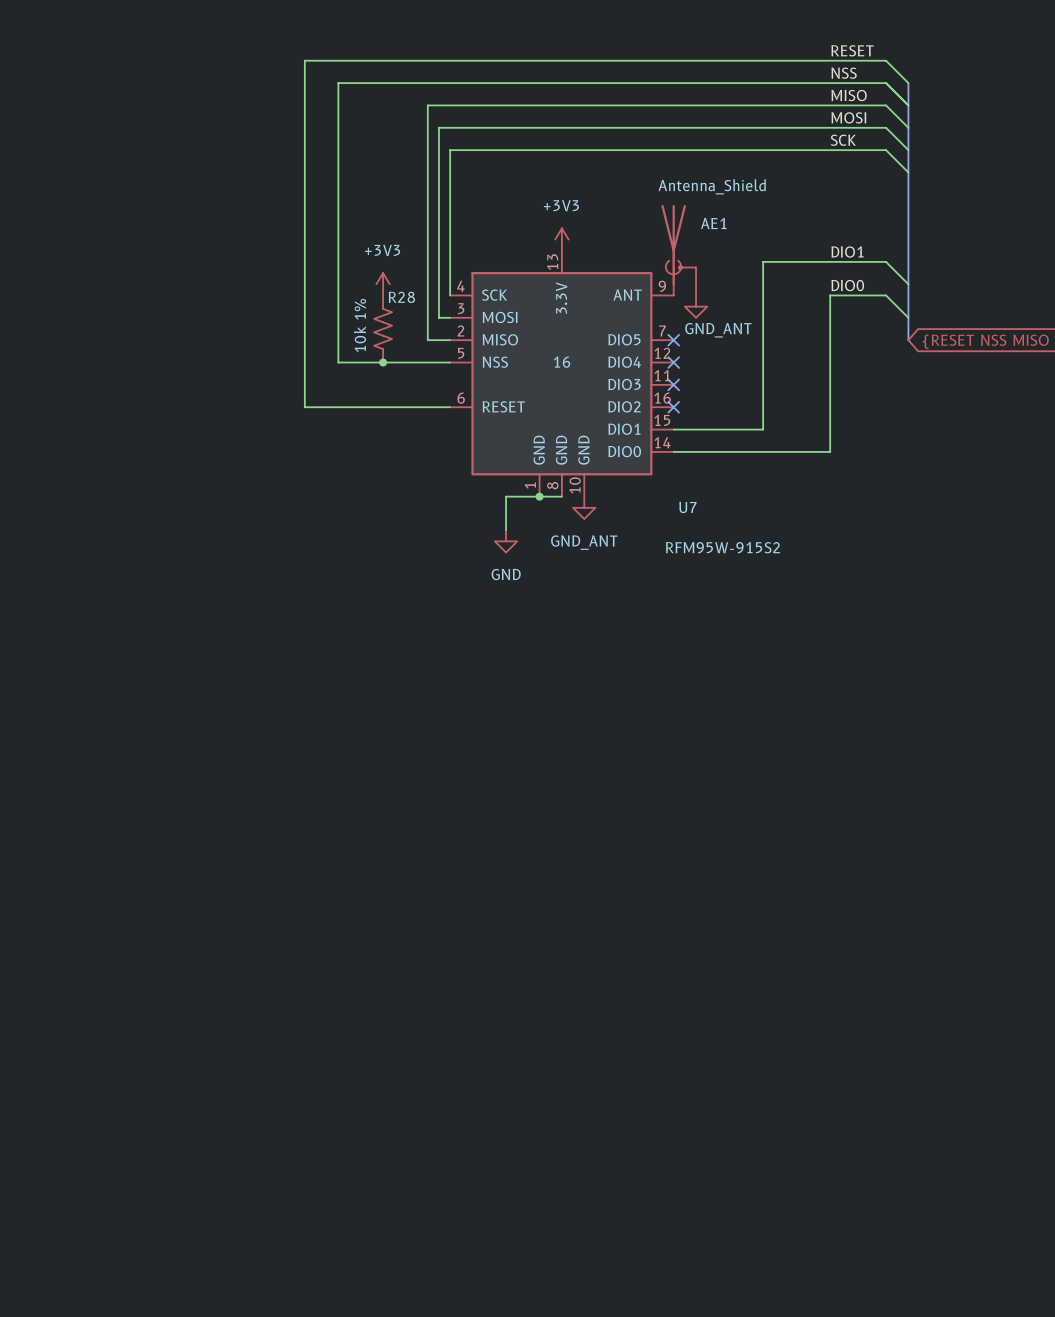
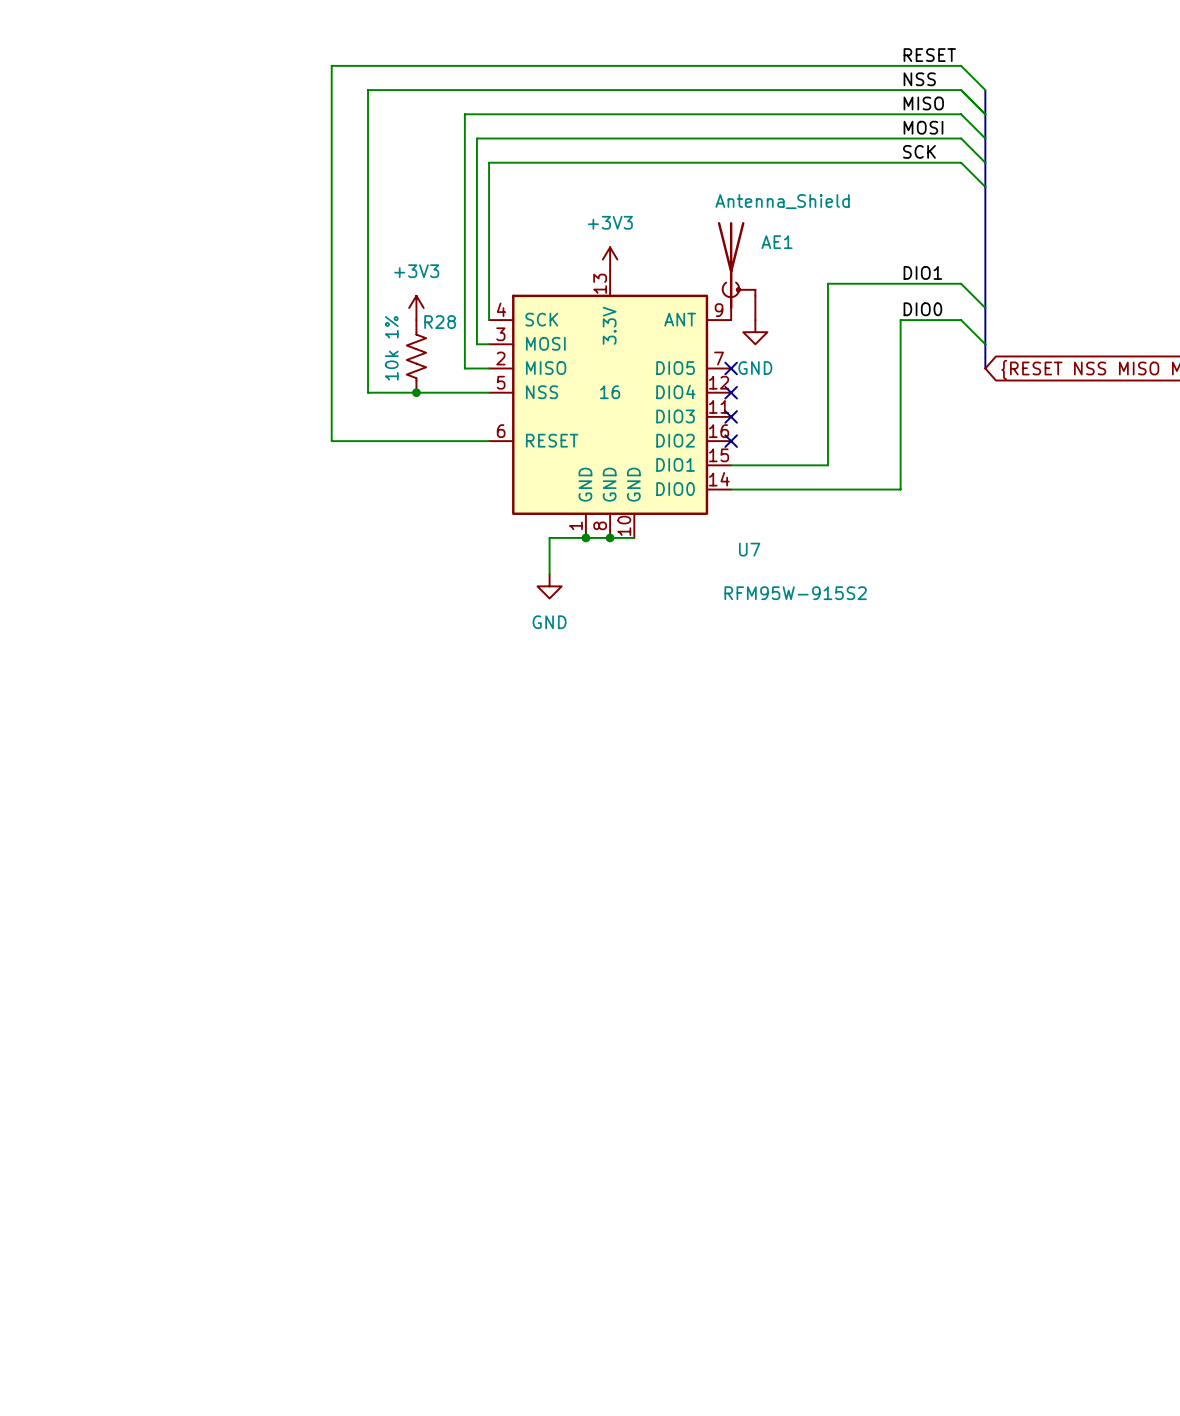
power symbol: GND_ANT (696, 306) -> GND (755, 332)
wire: none -> (610, 537) (634, 537)
junction: none -> (610, 537)
power symbol: GND_ANT (584, 507) -> none

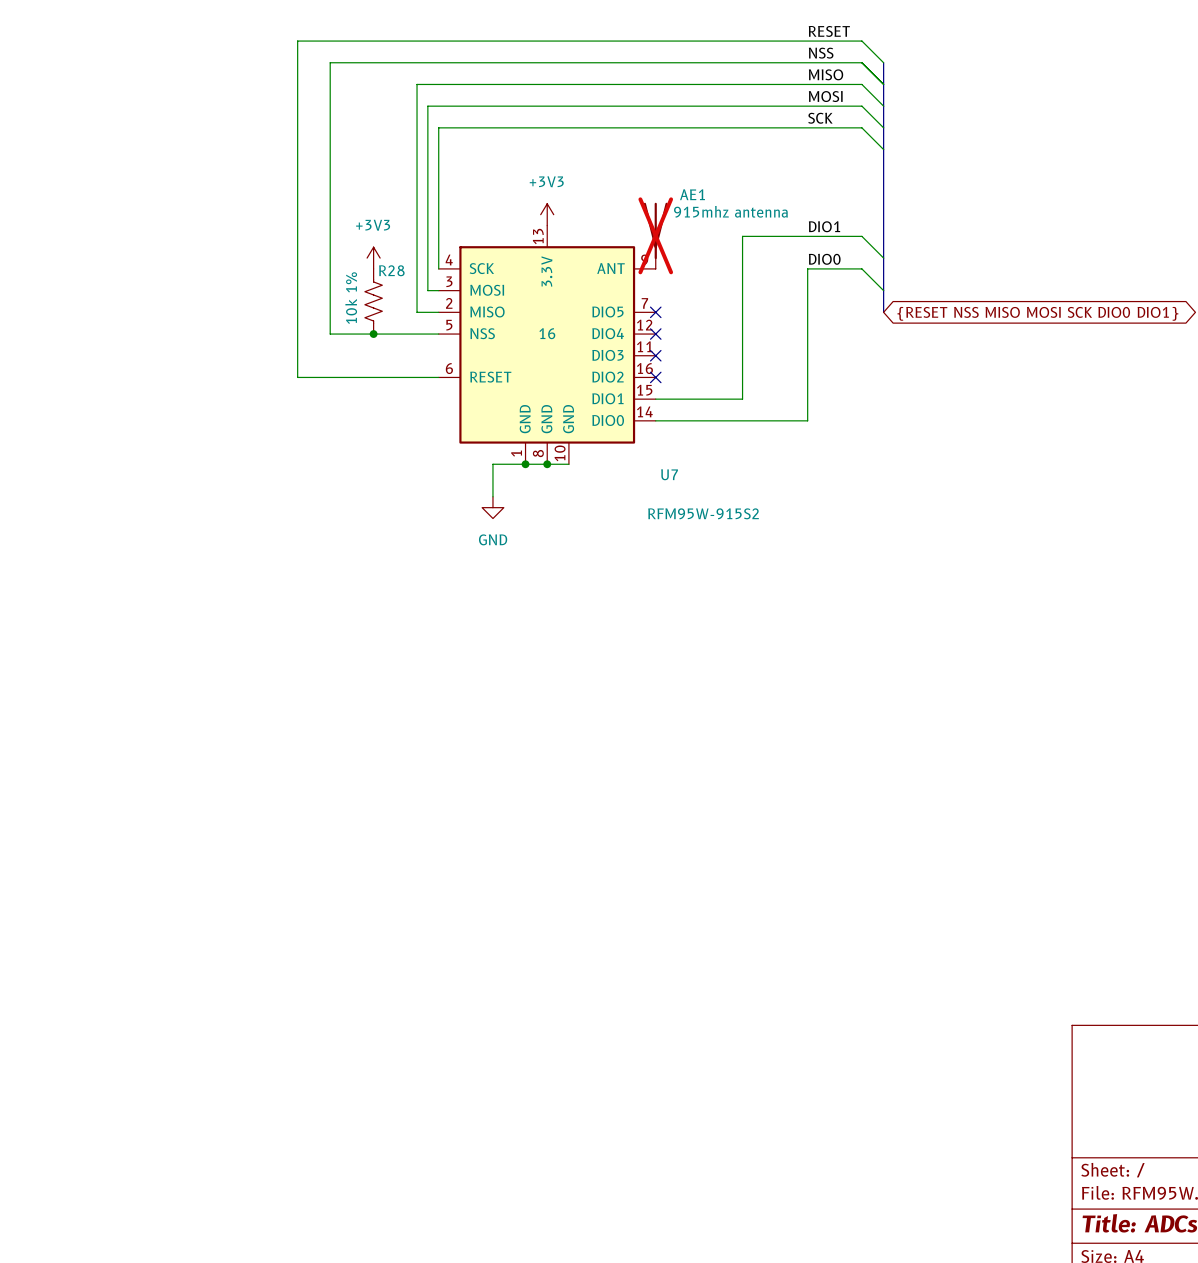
AE1 value: Antenna_Shield (782, 201) -> 915mhz antenna (730, 211)
AE1 symbol: [717, 222, 756, 321] -> [643, 202, 668, 269]
AE1 do-not-place cross: none -> (655, 235)
power symbol: GND (755, 332) -> none

